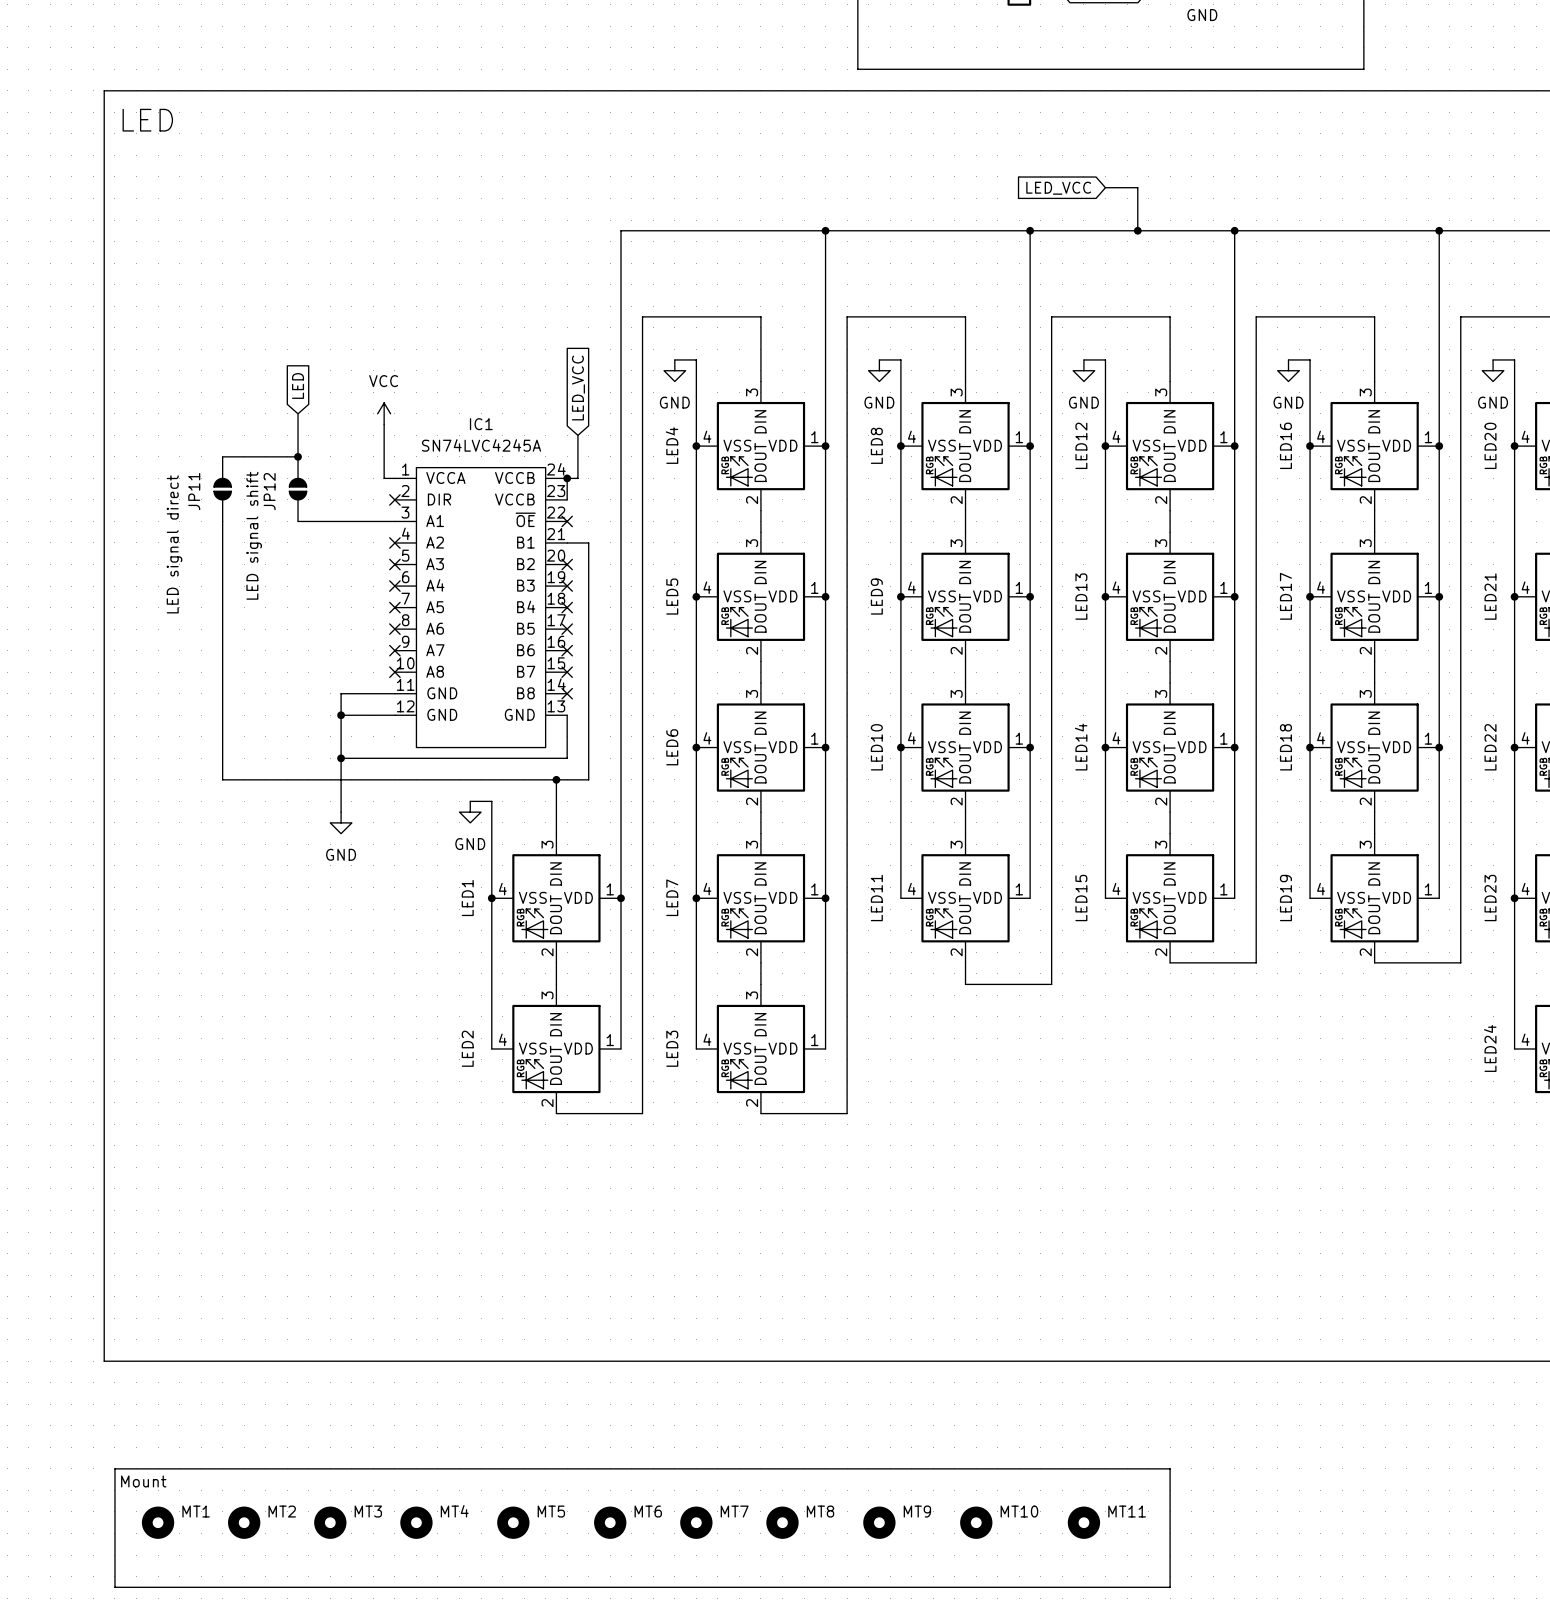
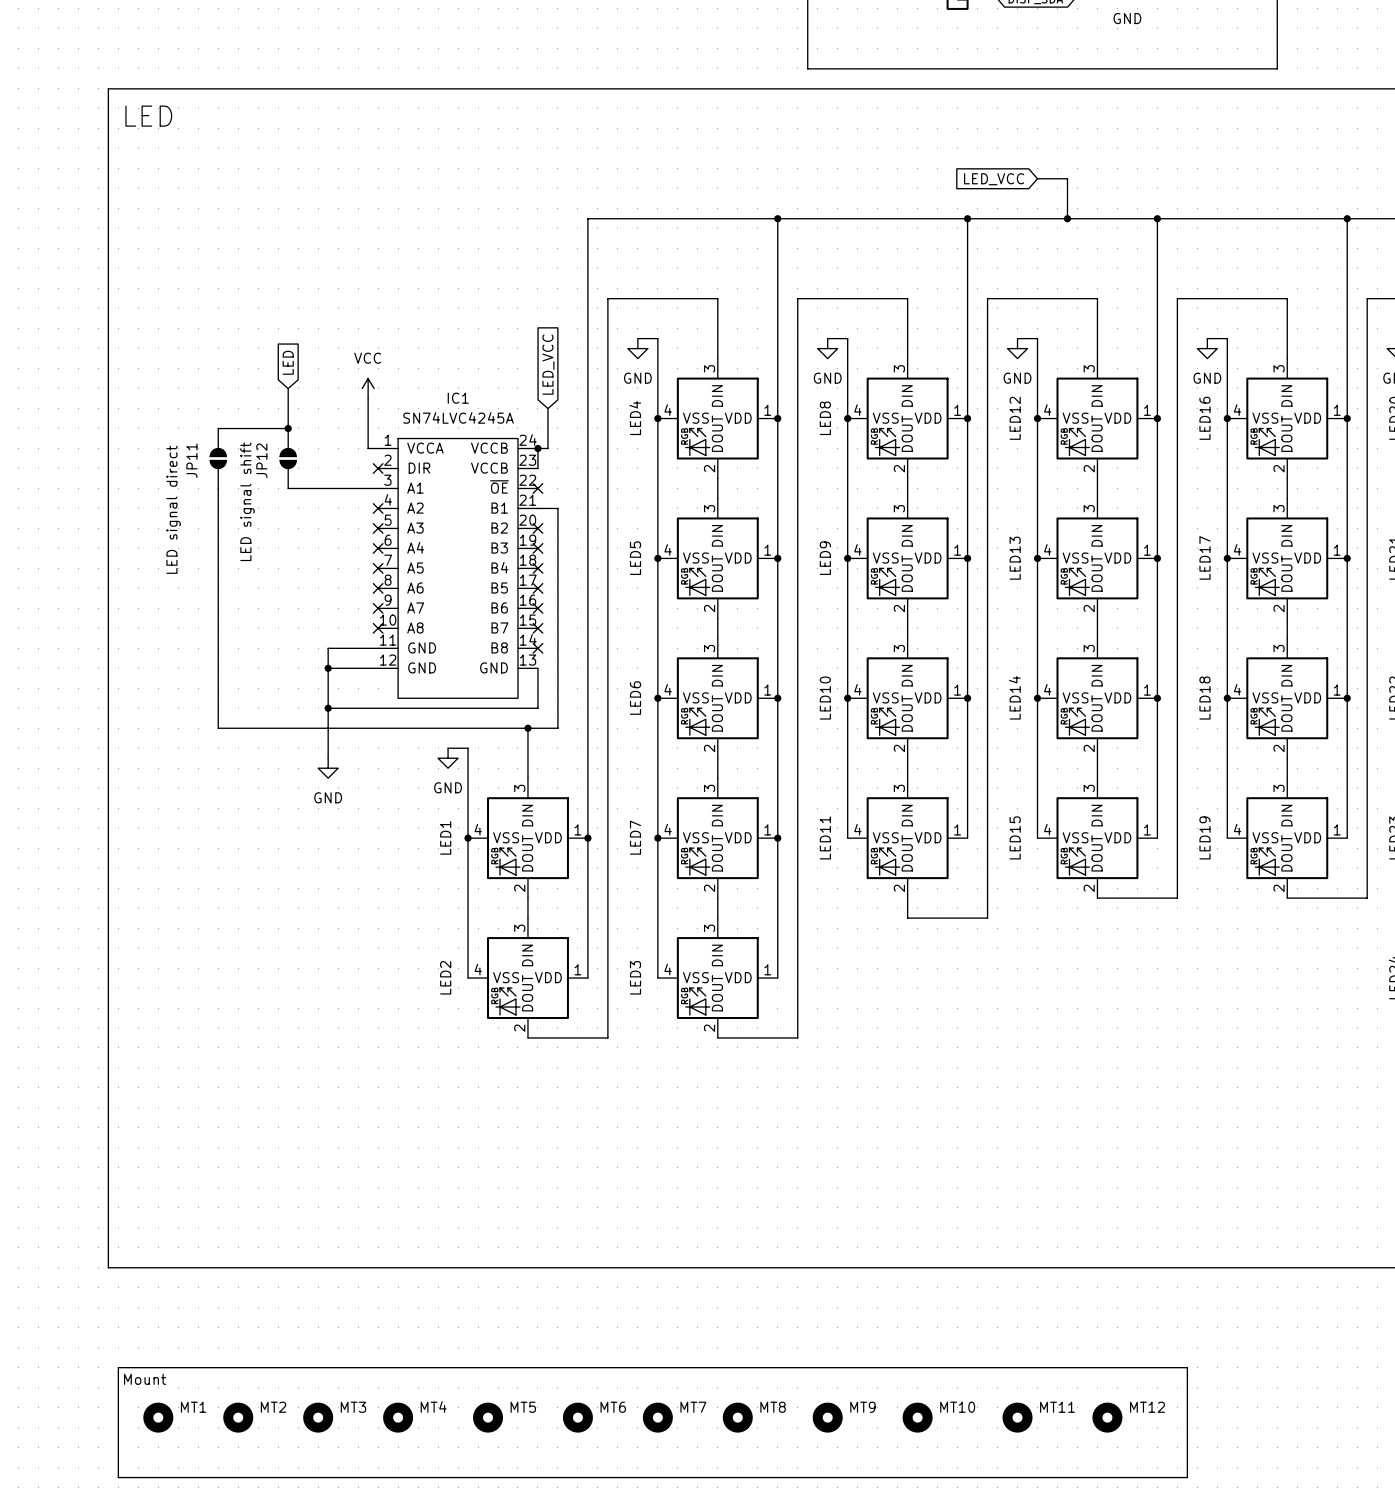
line: (1170, 1468) (1170, 1587) -> (1097, 1367) (1187, 1367) (1187, 1477) (1097, 1477)
MT12: none -> (1107, 1417)

